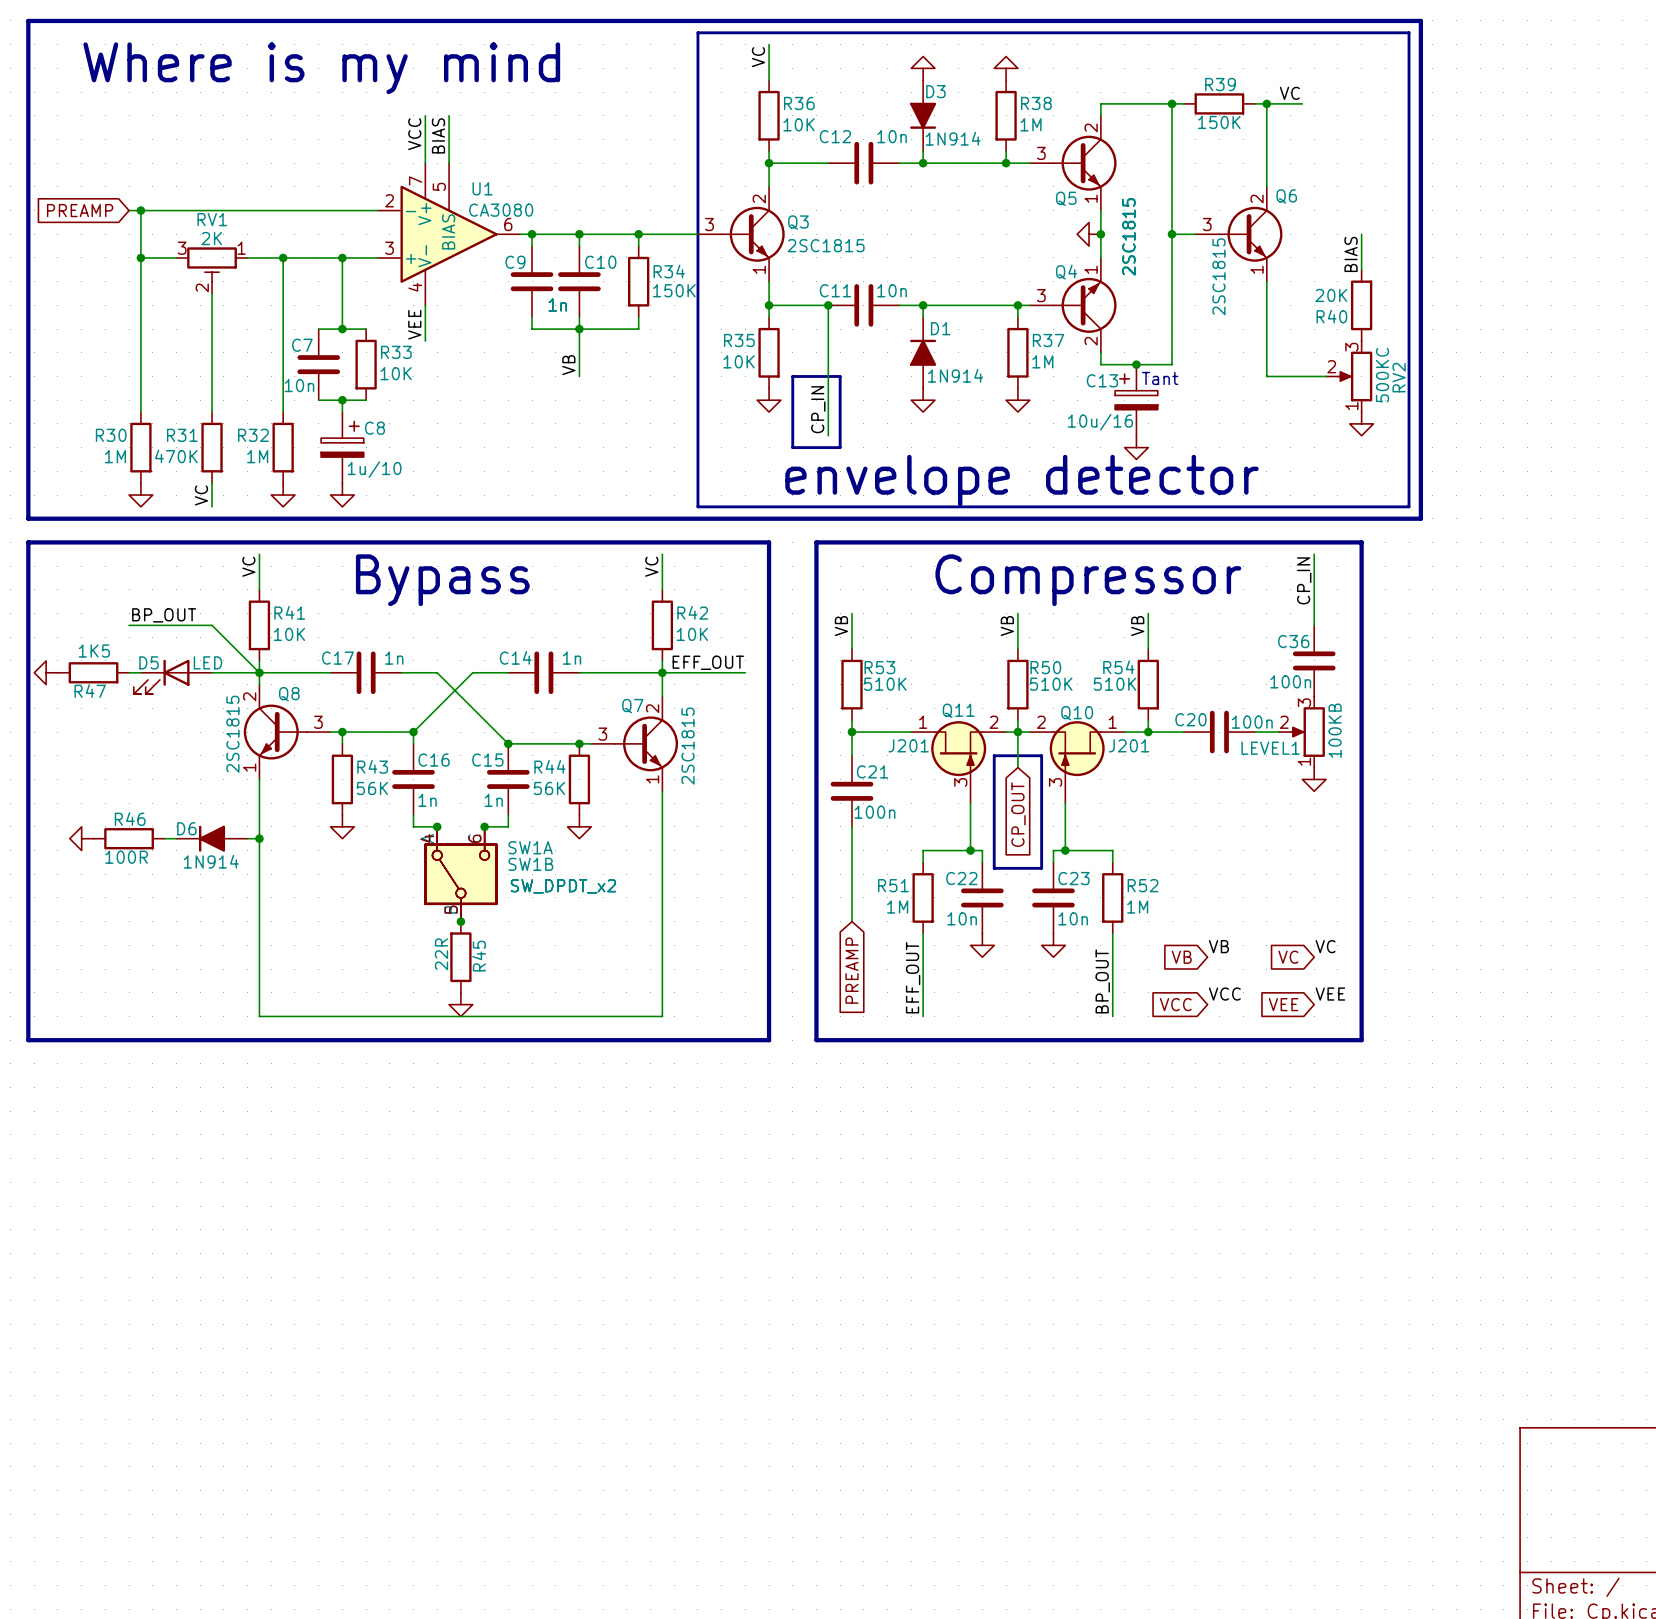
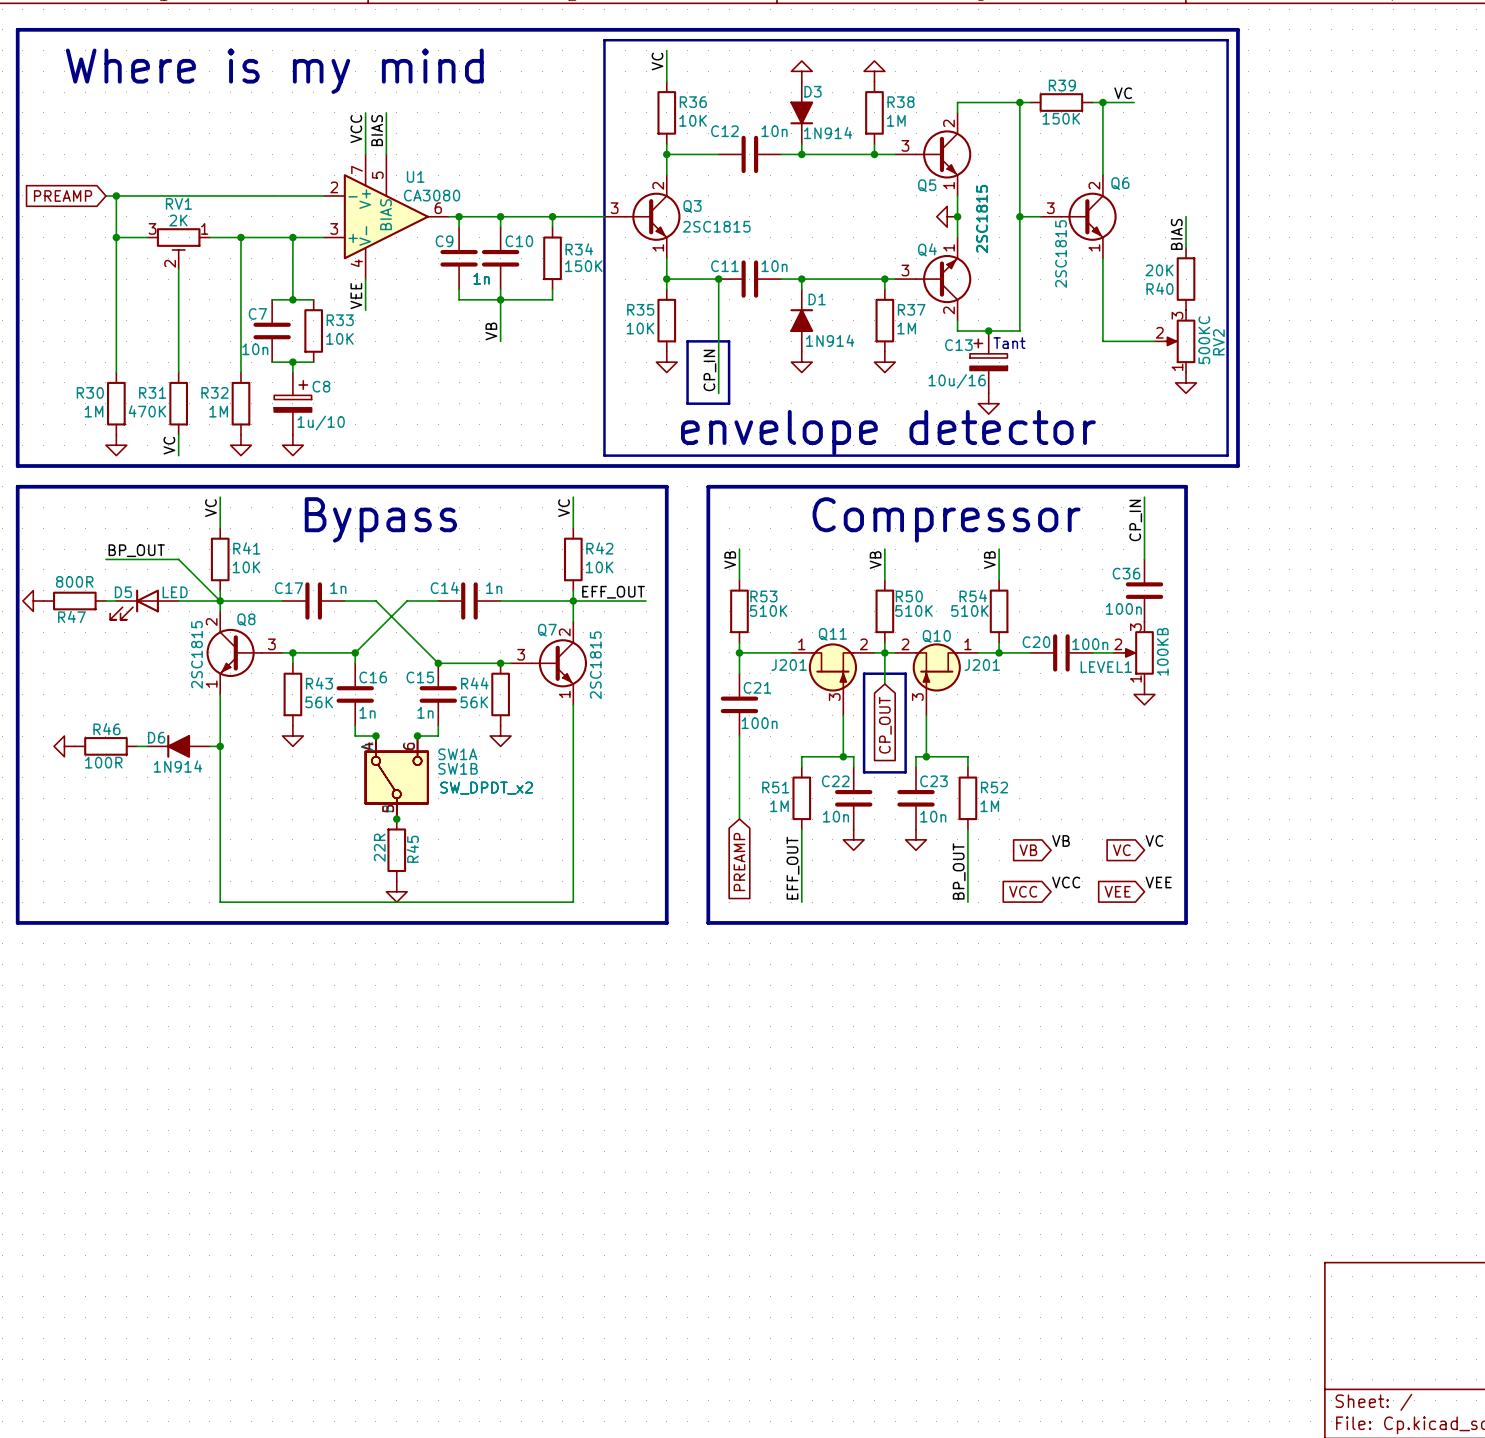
R47 value: 1K5 (94, 651) -> 800R (74, 581)

